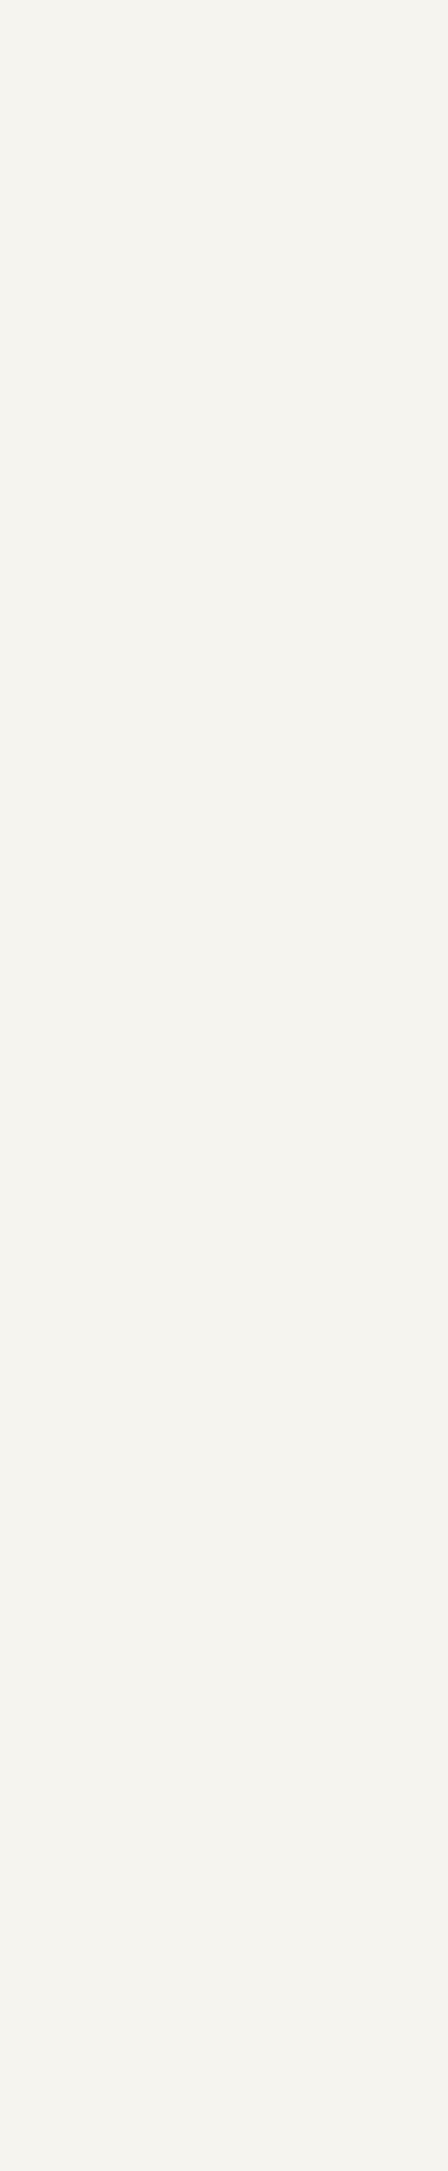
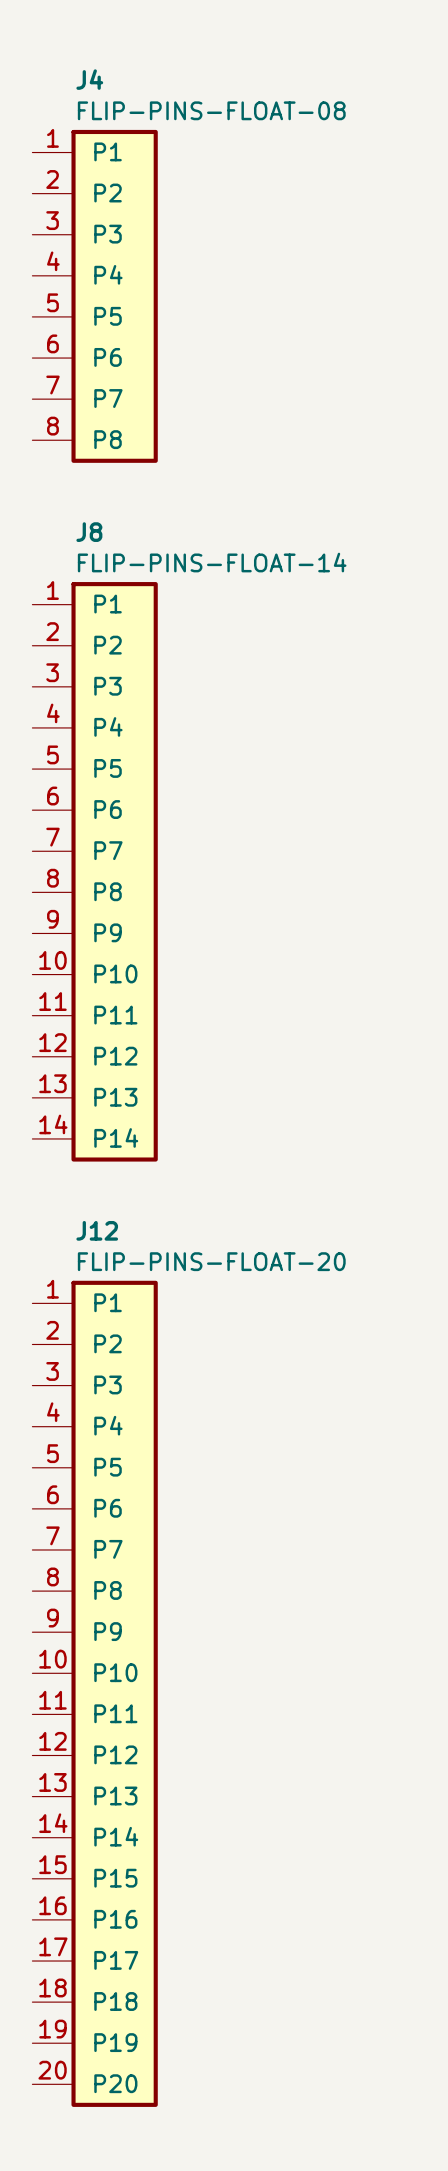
J4: none -> FLIP-PINS-FLOAT-08 (95, 296)
J8: none -> FLIP-PINS-FLOAT-14 (95, 871)
J12: none -> FLIP-PINS-FLOAT-20 (95, 1693)

